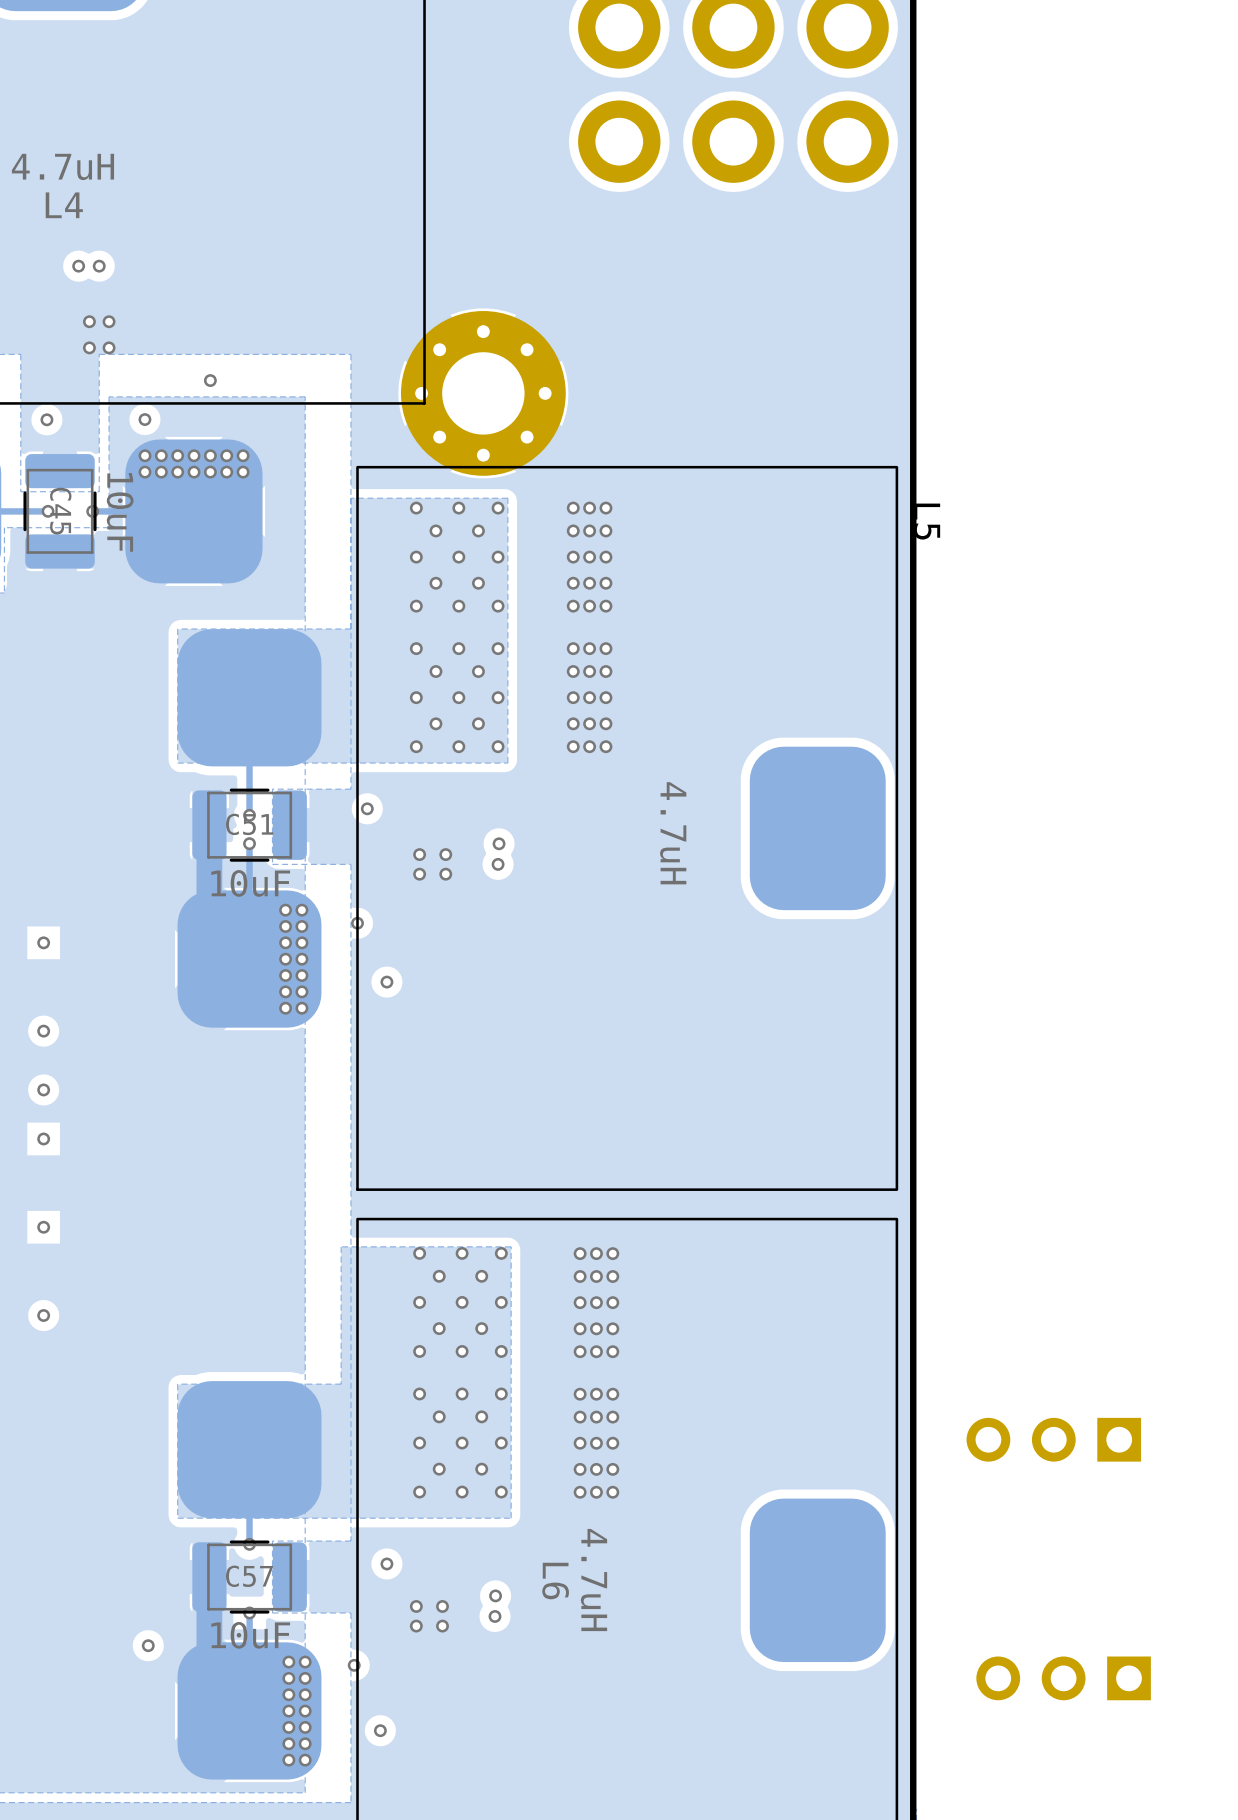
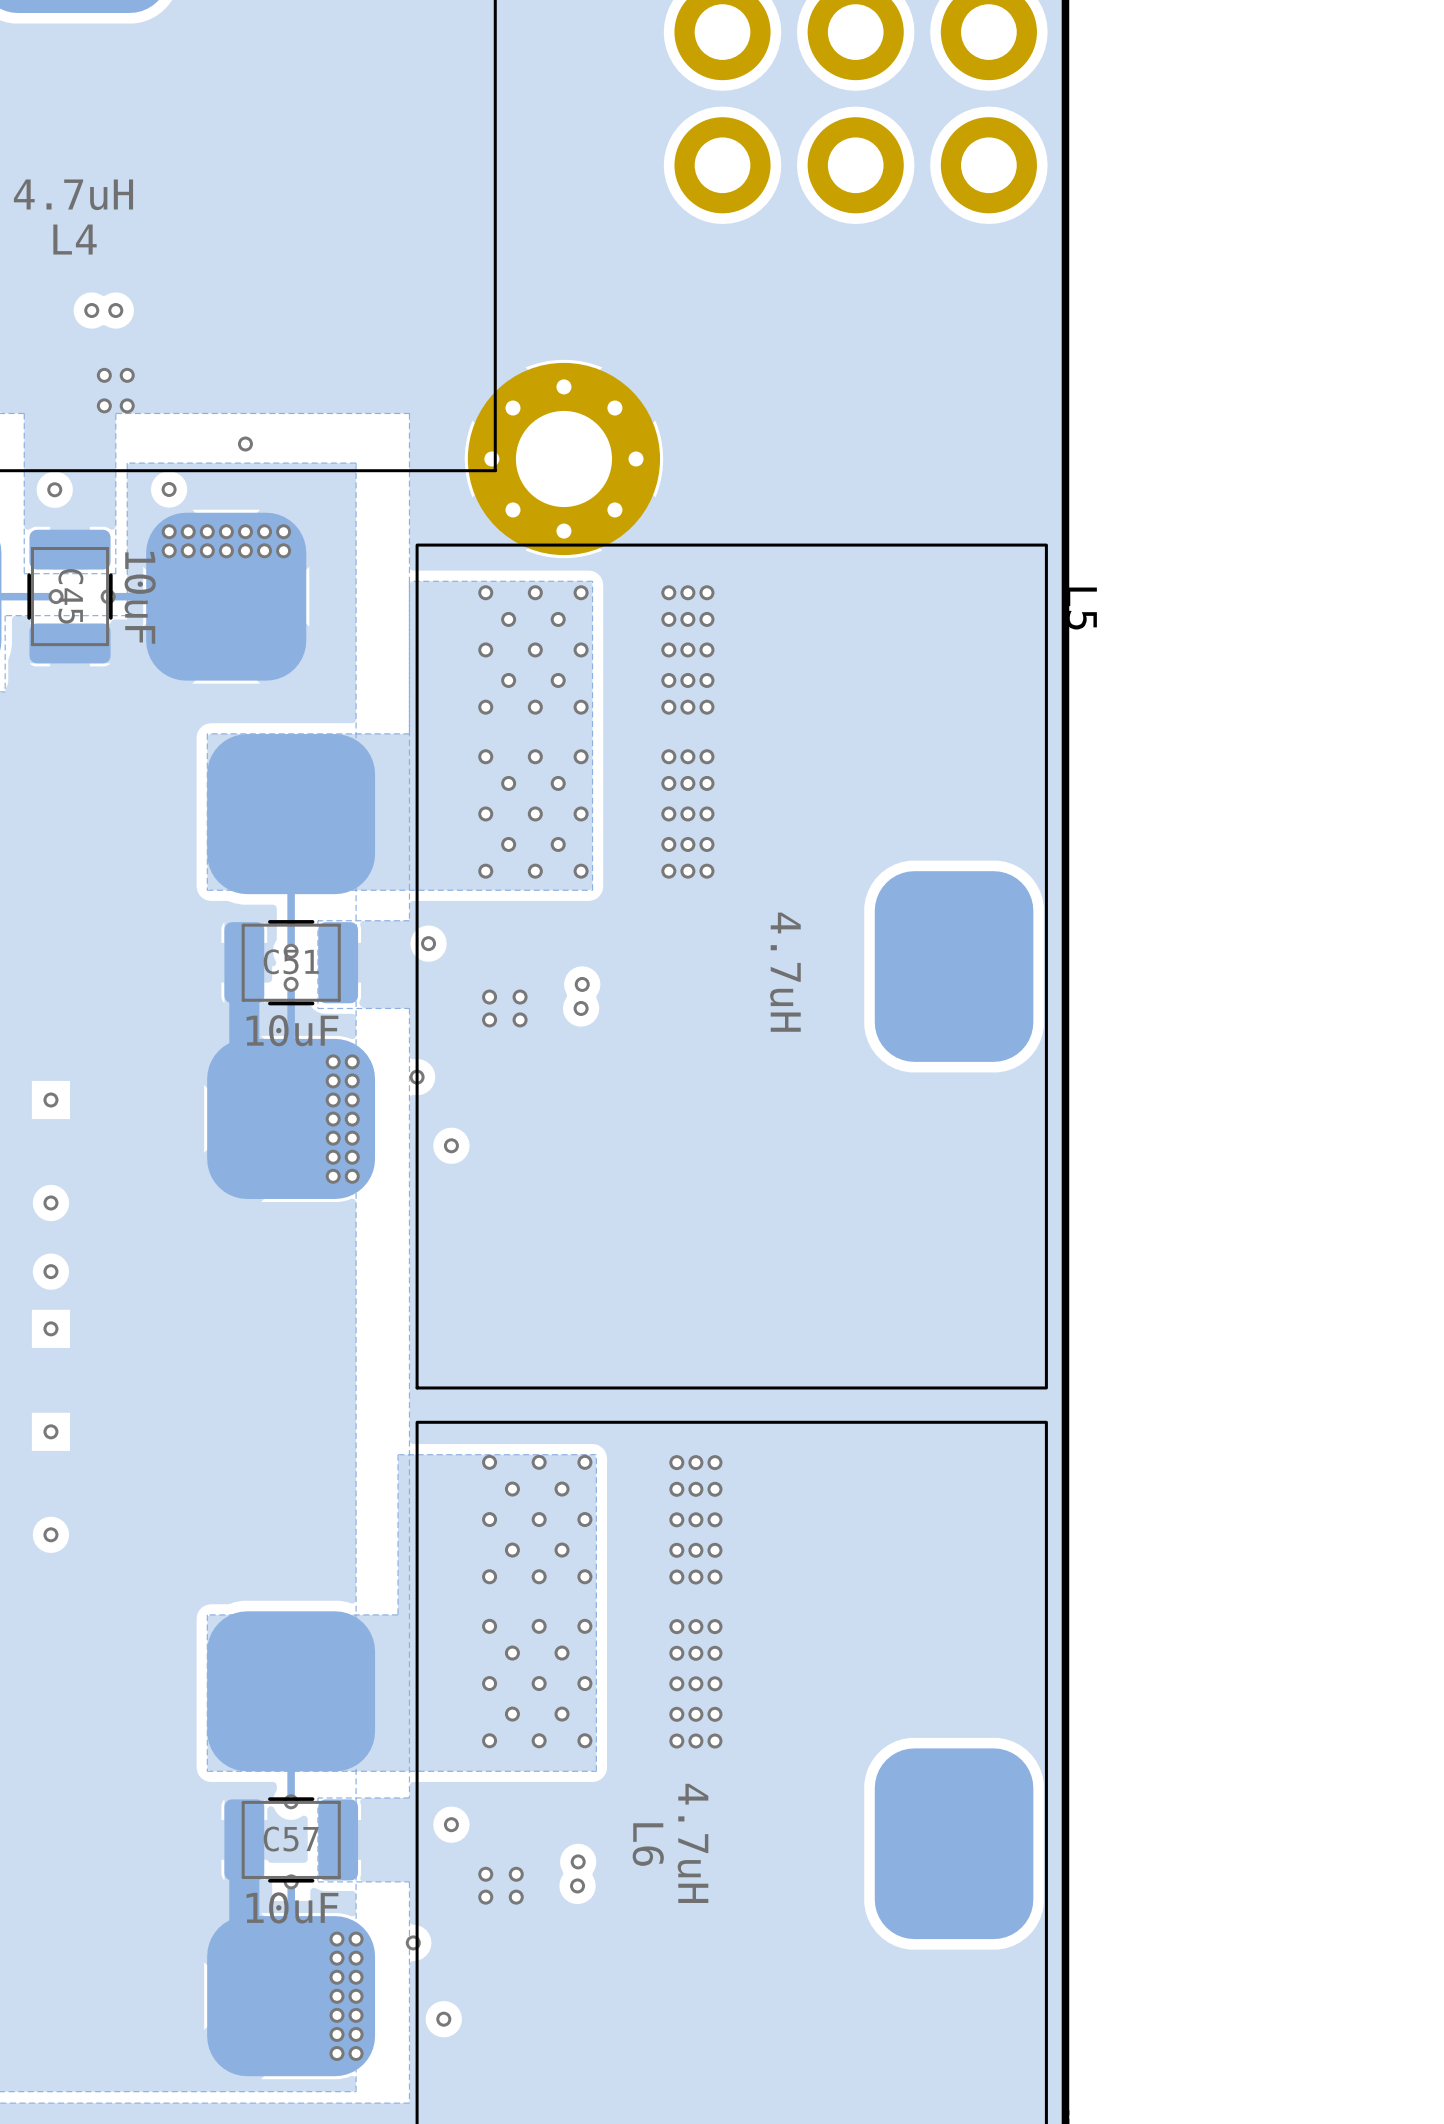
part: (1053, 1439) -> none
via: (148, 1645) -> none
part: (1063, 1678) -> none

